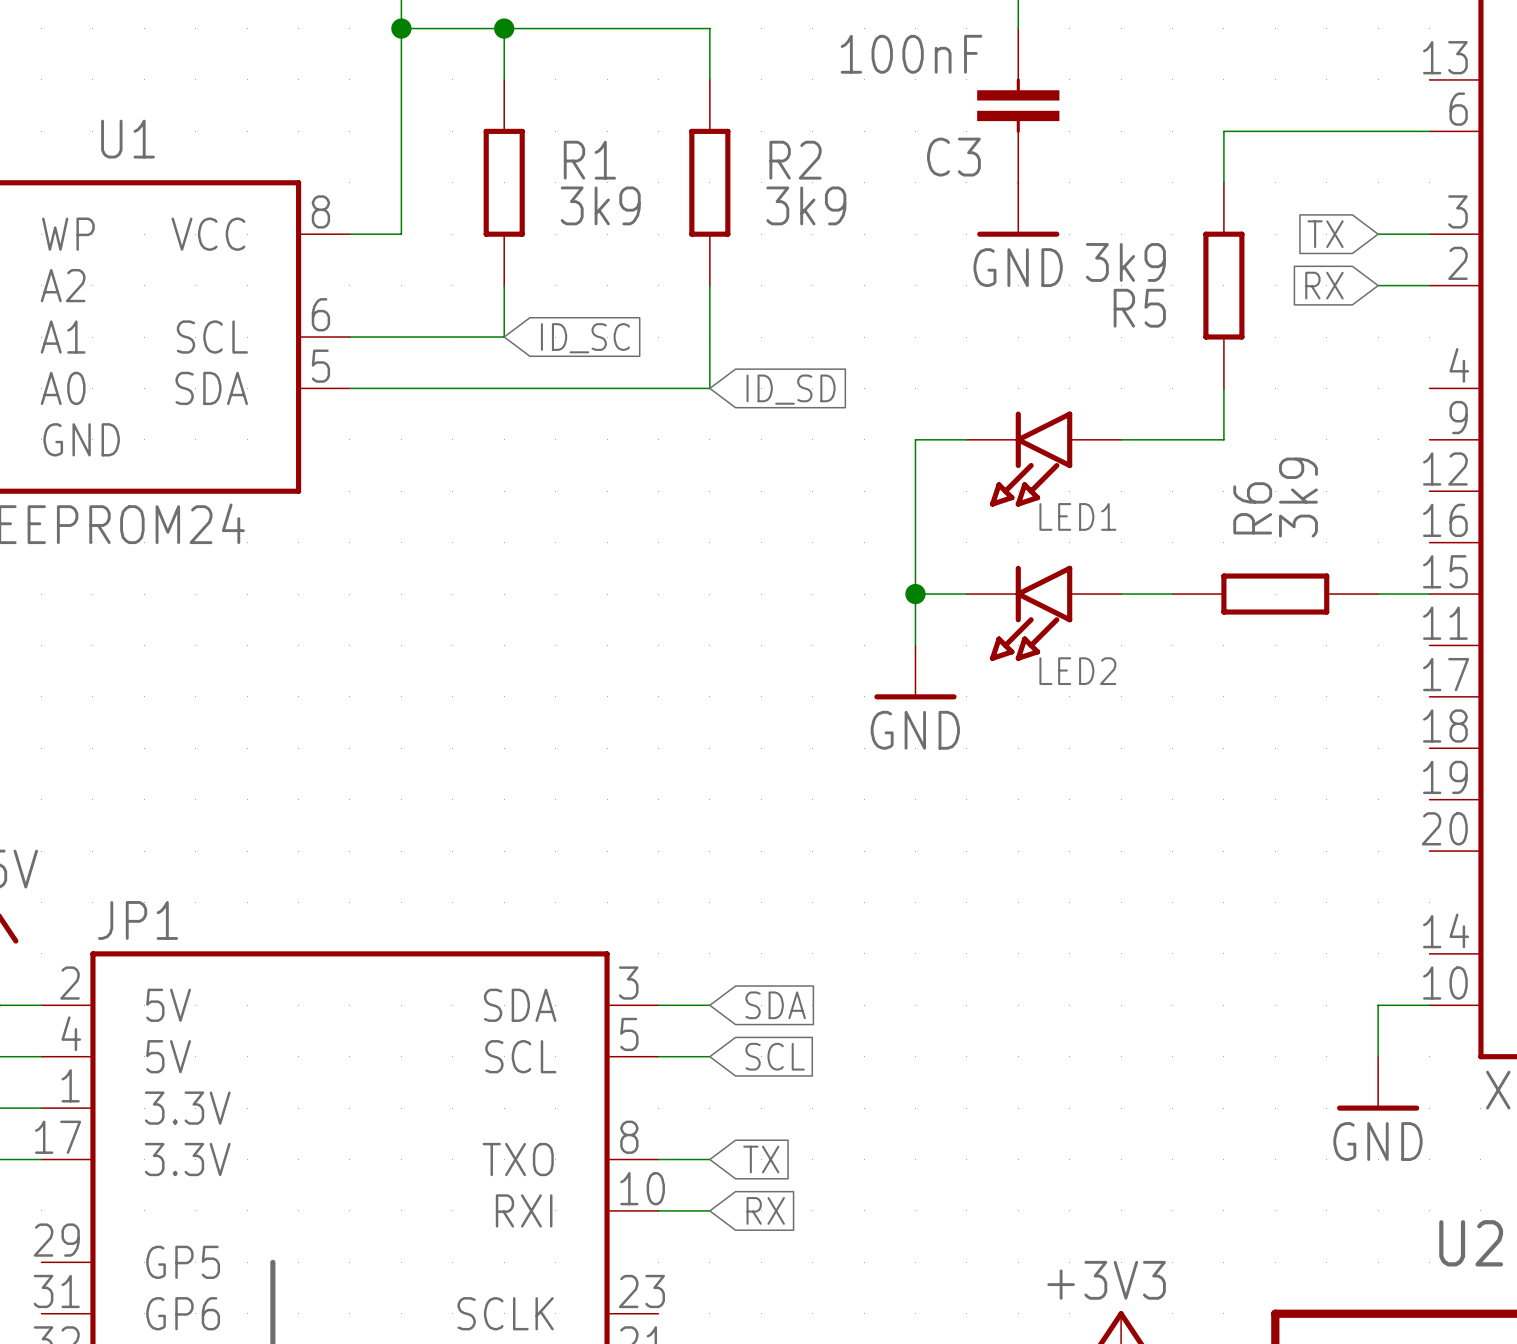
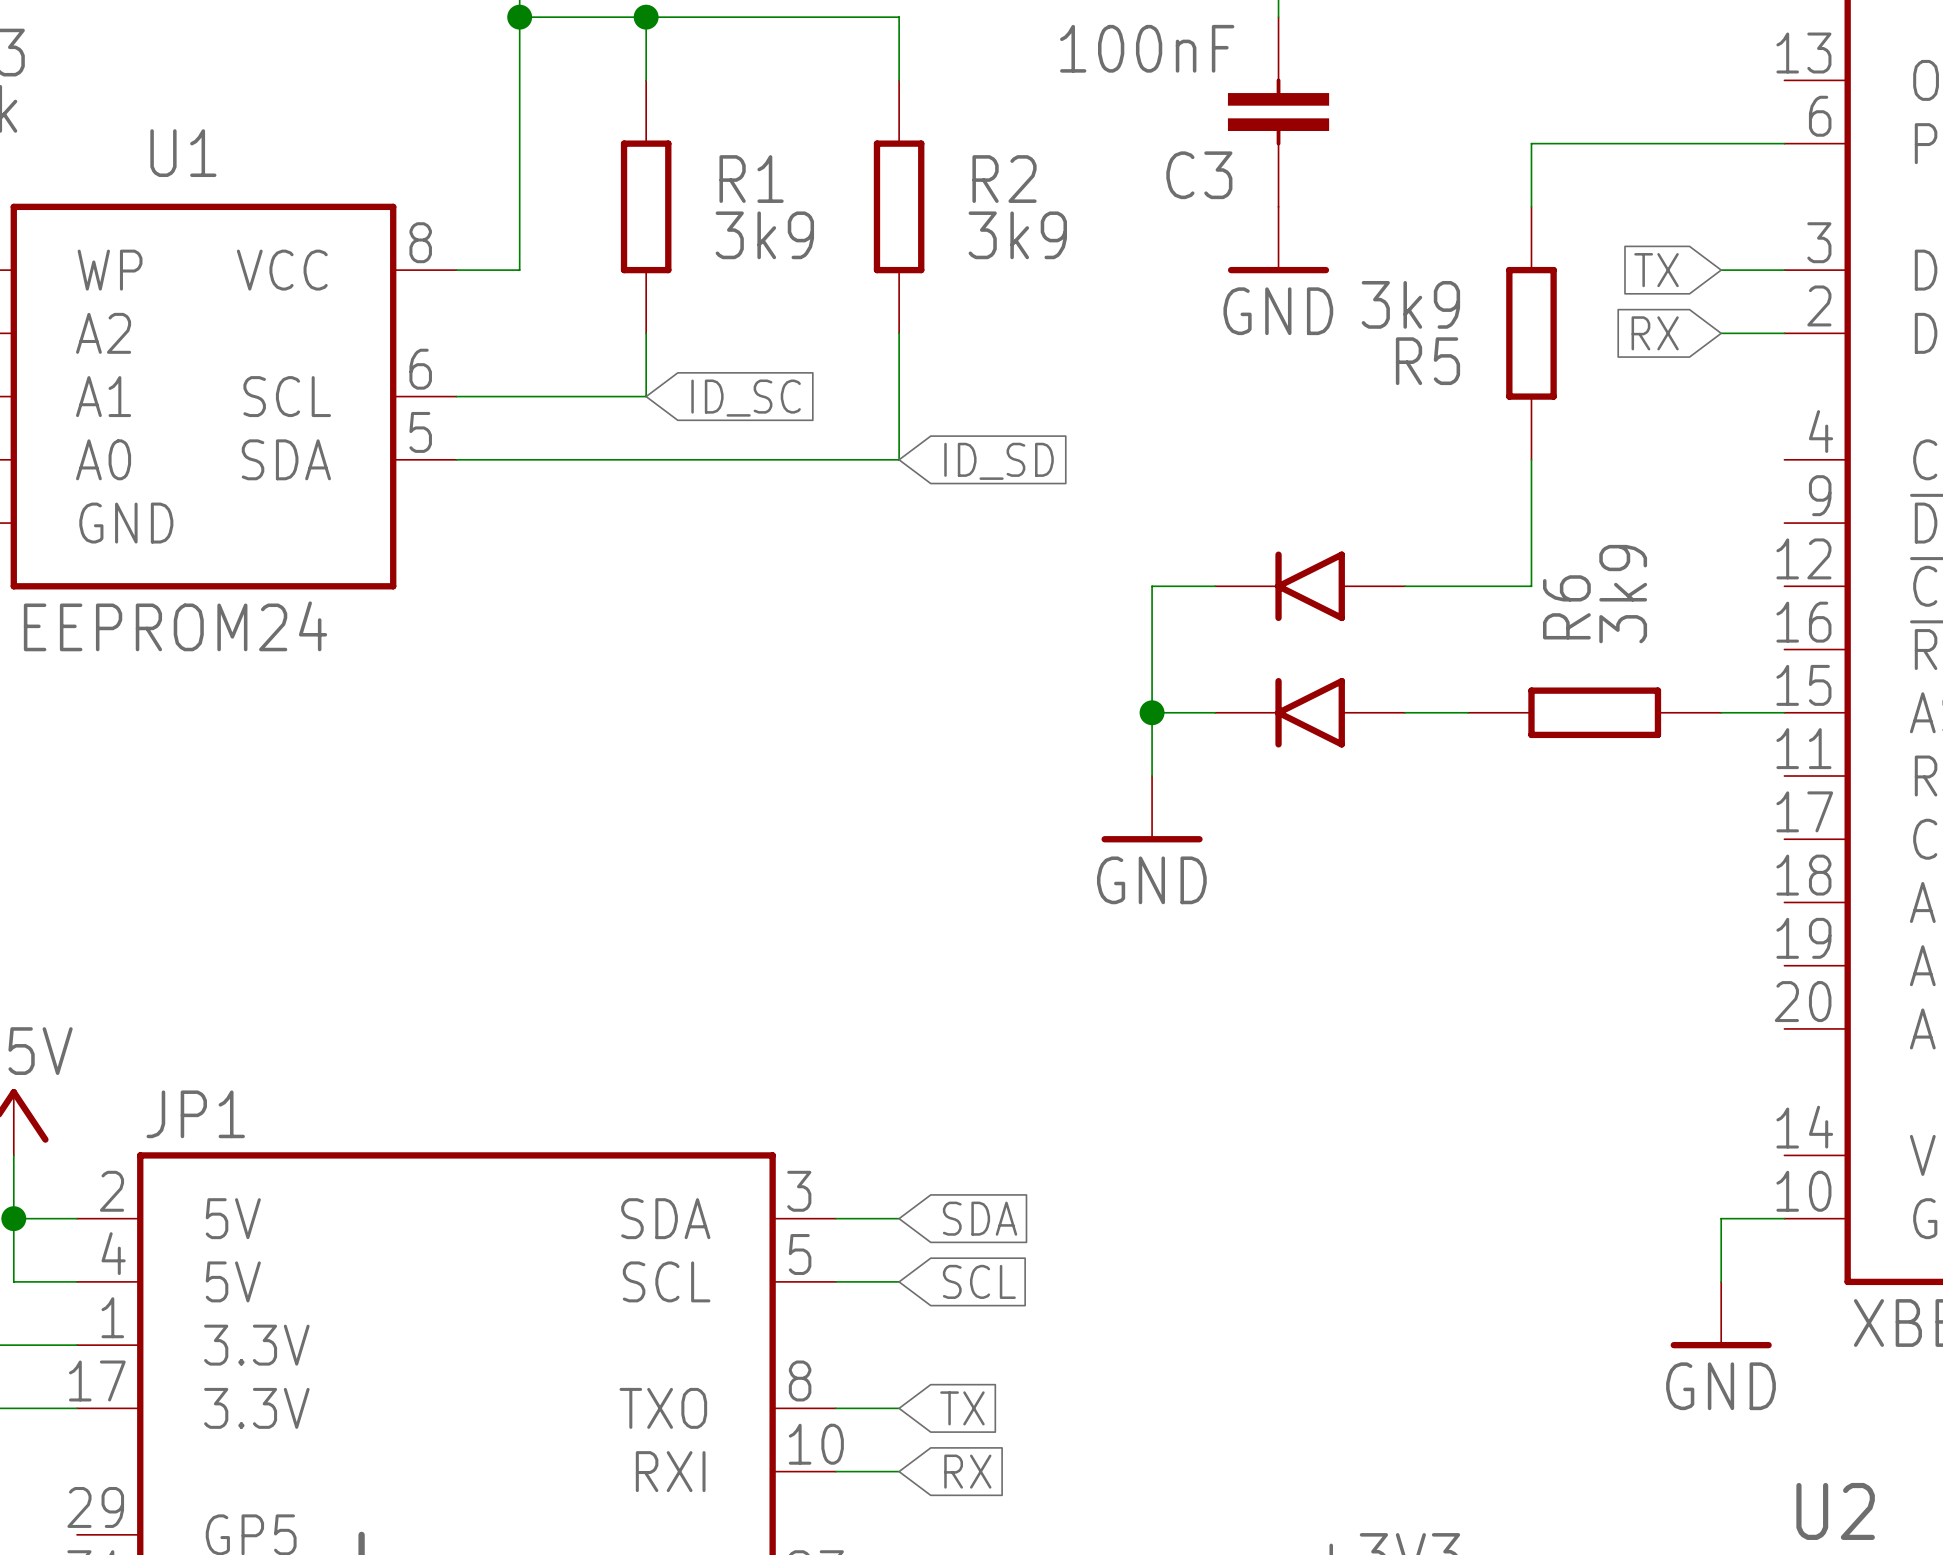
wire: (966, 439) (915, 439) (915, 491) -> (1215, 586) (1152, 586)
wire: (1121, 439) (1223, 439) -> (1405, 586) (1531, 586) (1531, 523)
LED1: (1043, 459) -> none
part: none -> (1310, 649)
LED2: (1043, 613) -> none

